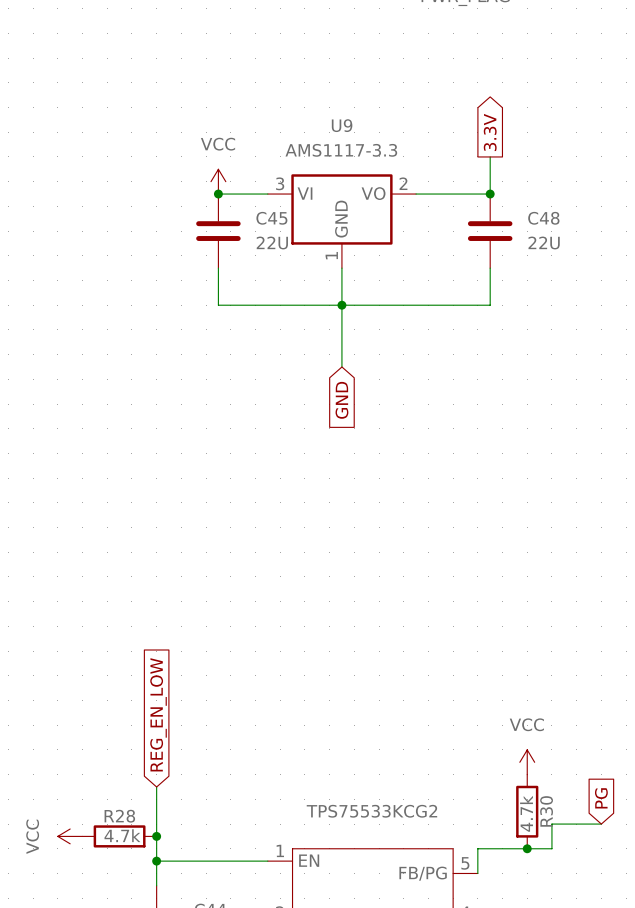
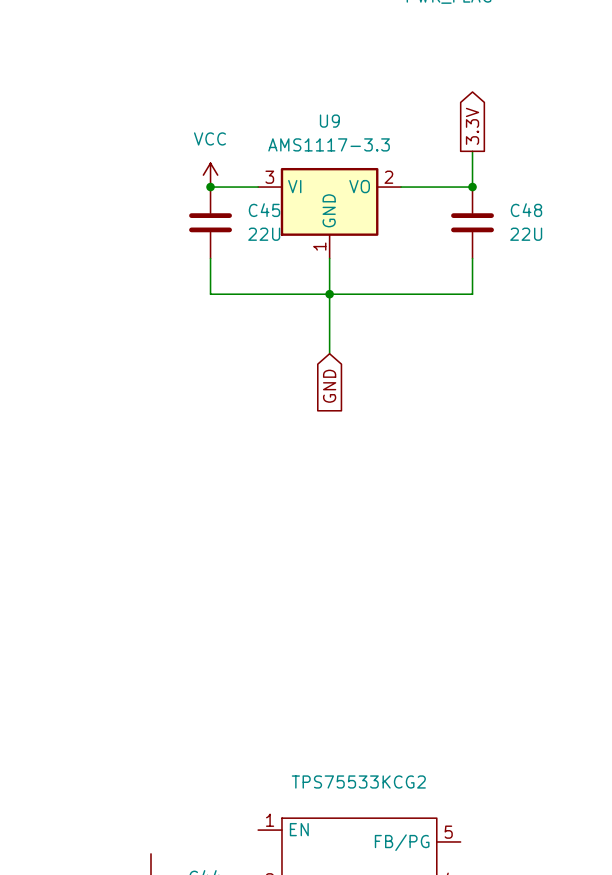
global label: REG_EN_LOW (158, 714) -> none
power symbol: VCC (527, 762) -> none
wire: (156, 787) (156, 885) -> none
global label: PG (601, 798) -> none
R30: 4.7k (527, 811) -> none
wire: (601, 824) (551, 824) (551, 848) (477, 848) (477, 873) -> none
power symbol: VCC (70, 836) -> none
R28: 4.7k (119, 836) -> none
junction: (156, 836) -> none
junction: (527, 848) -> none
wire: (156, 861) (267, 861) -> none
junction: (156, 861) -> none

